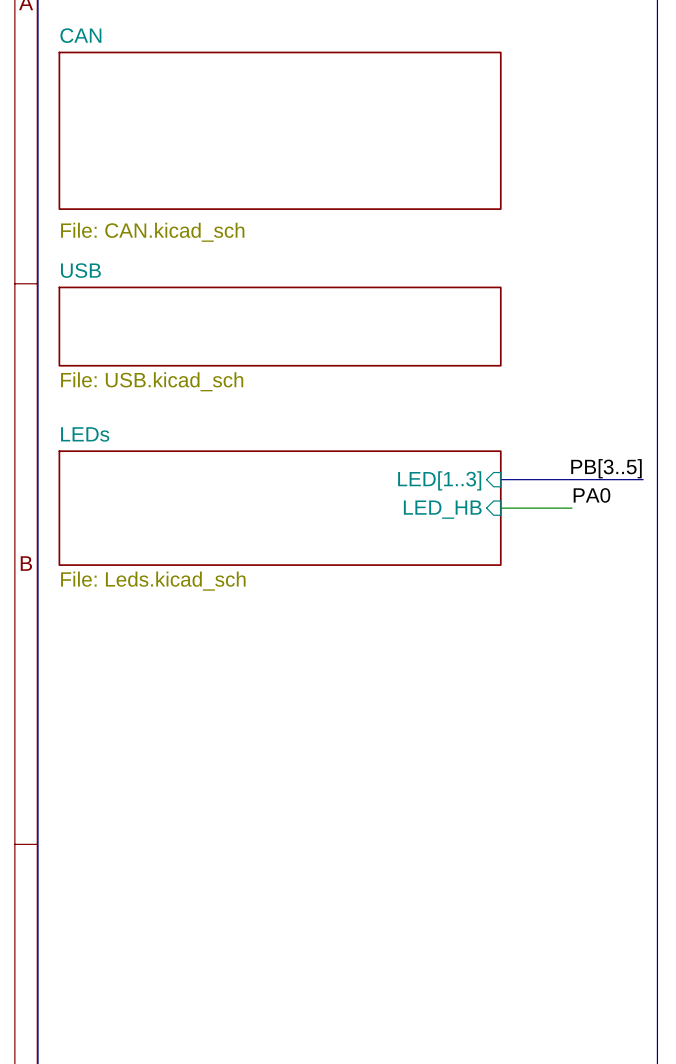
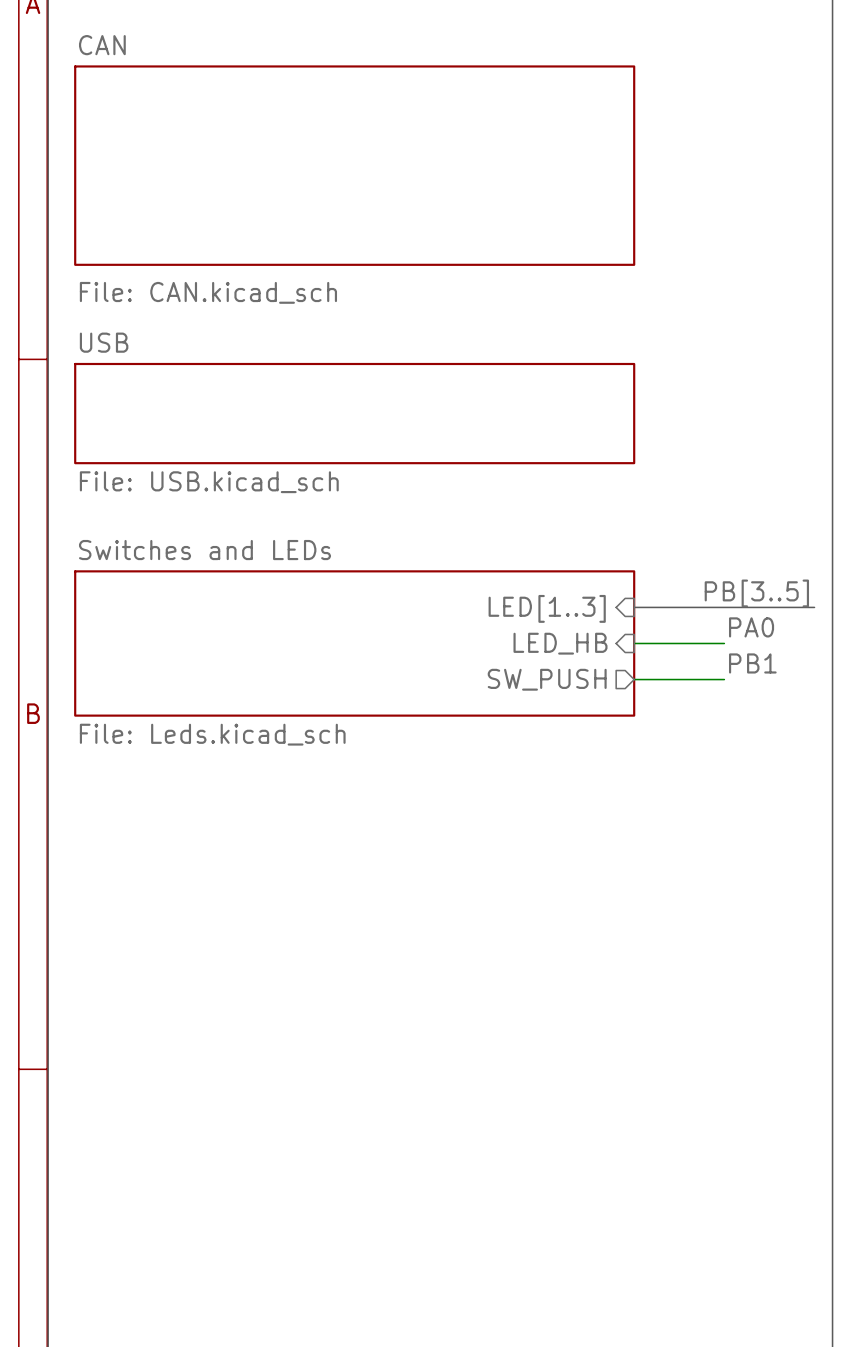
sheet LEDs name: LEDs (85, 434) -> Switches and LEDs (204, 550)
label: none -> PB1 (752, 663)
wire: none -> (634, 679) (724, 679)
sheet pin: none -> SW_PUSH (547, 679)

